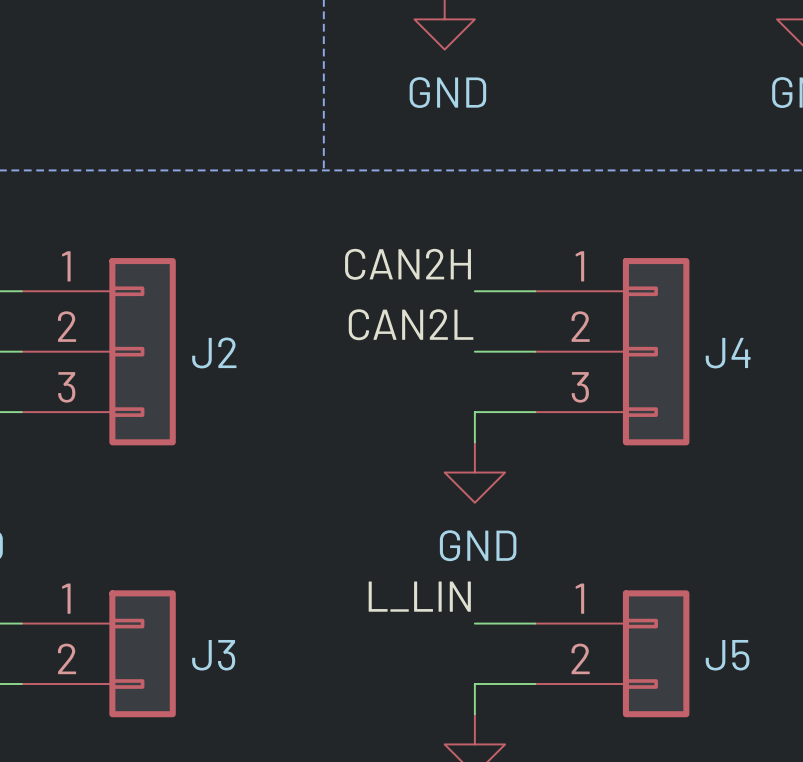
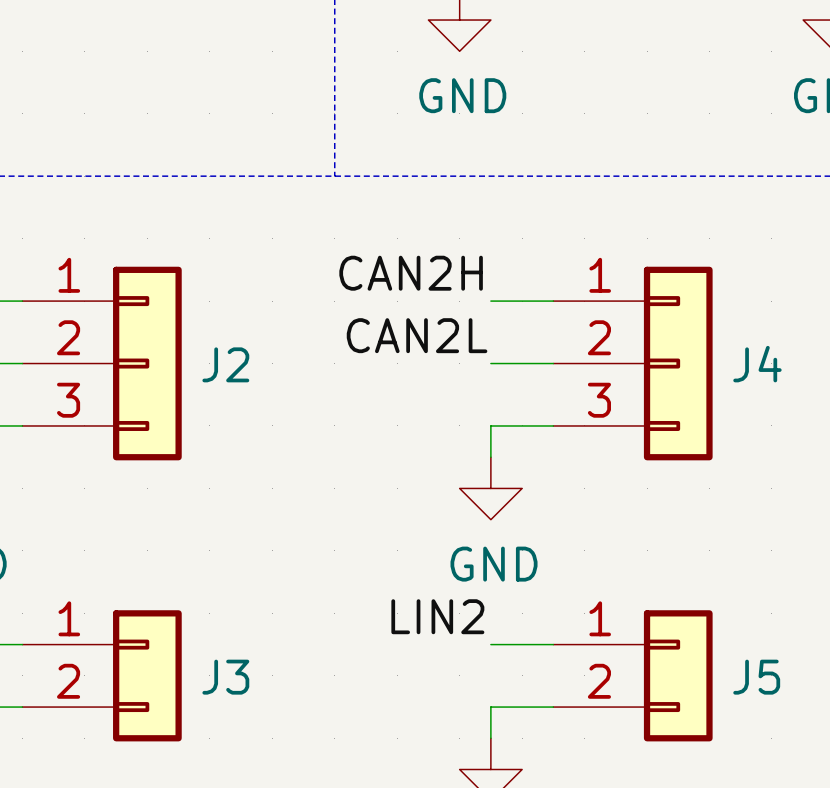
label: L_LIN (419, 596) -> LIN2 (437, 616)

